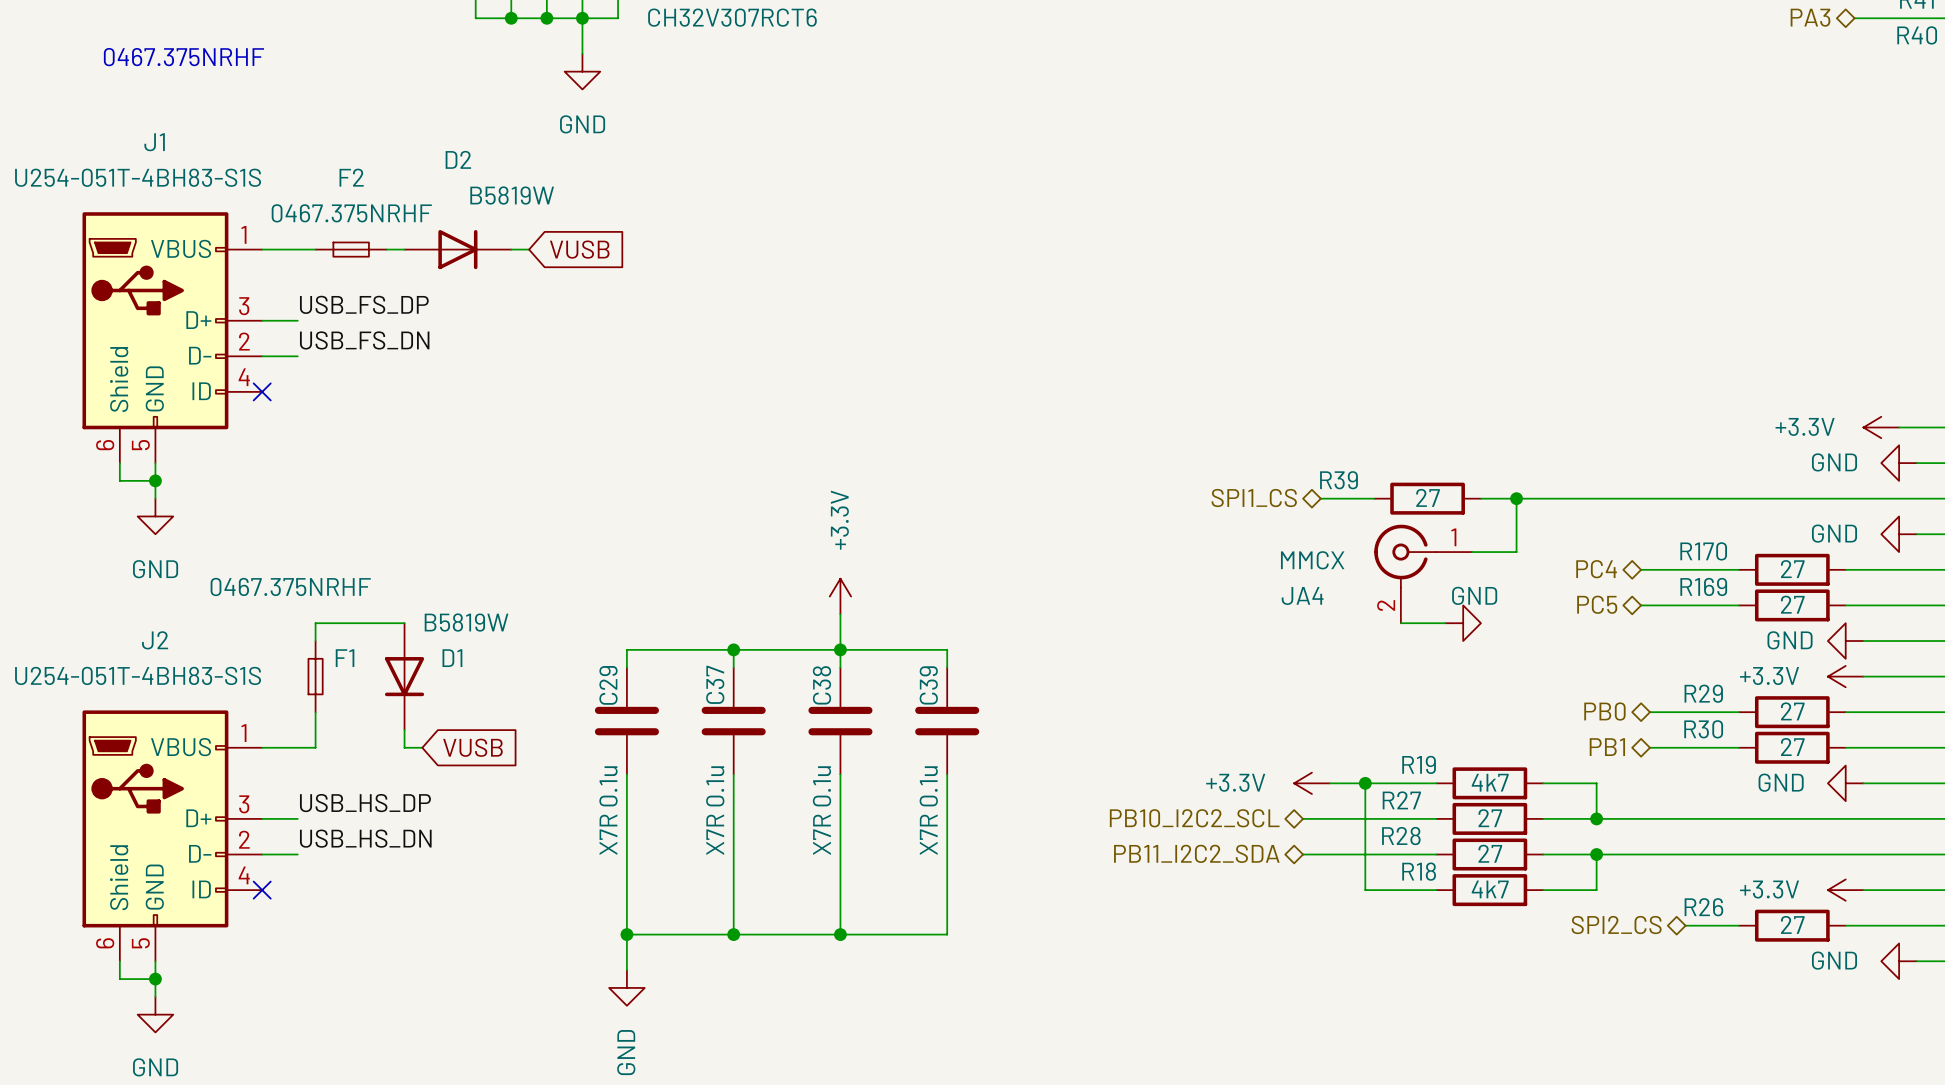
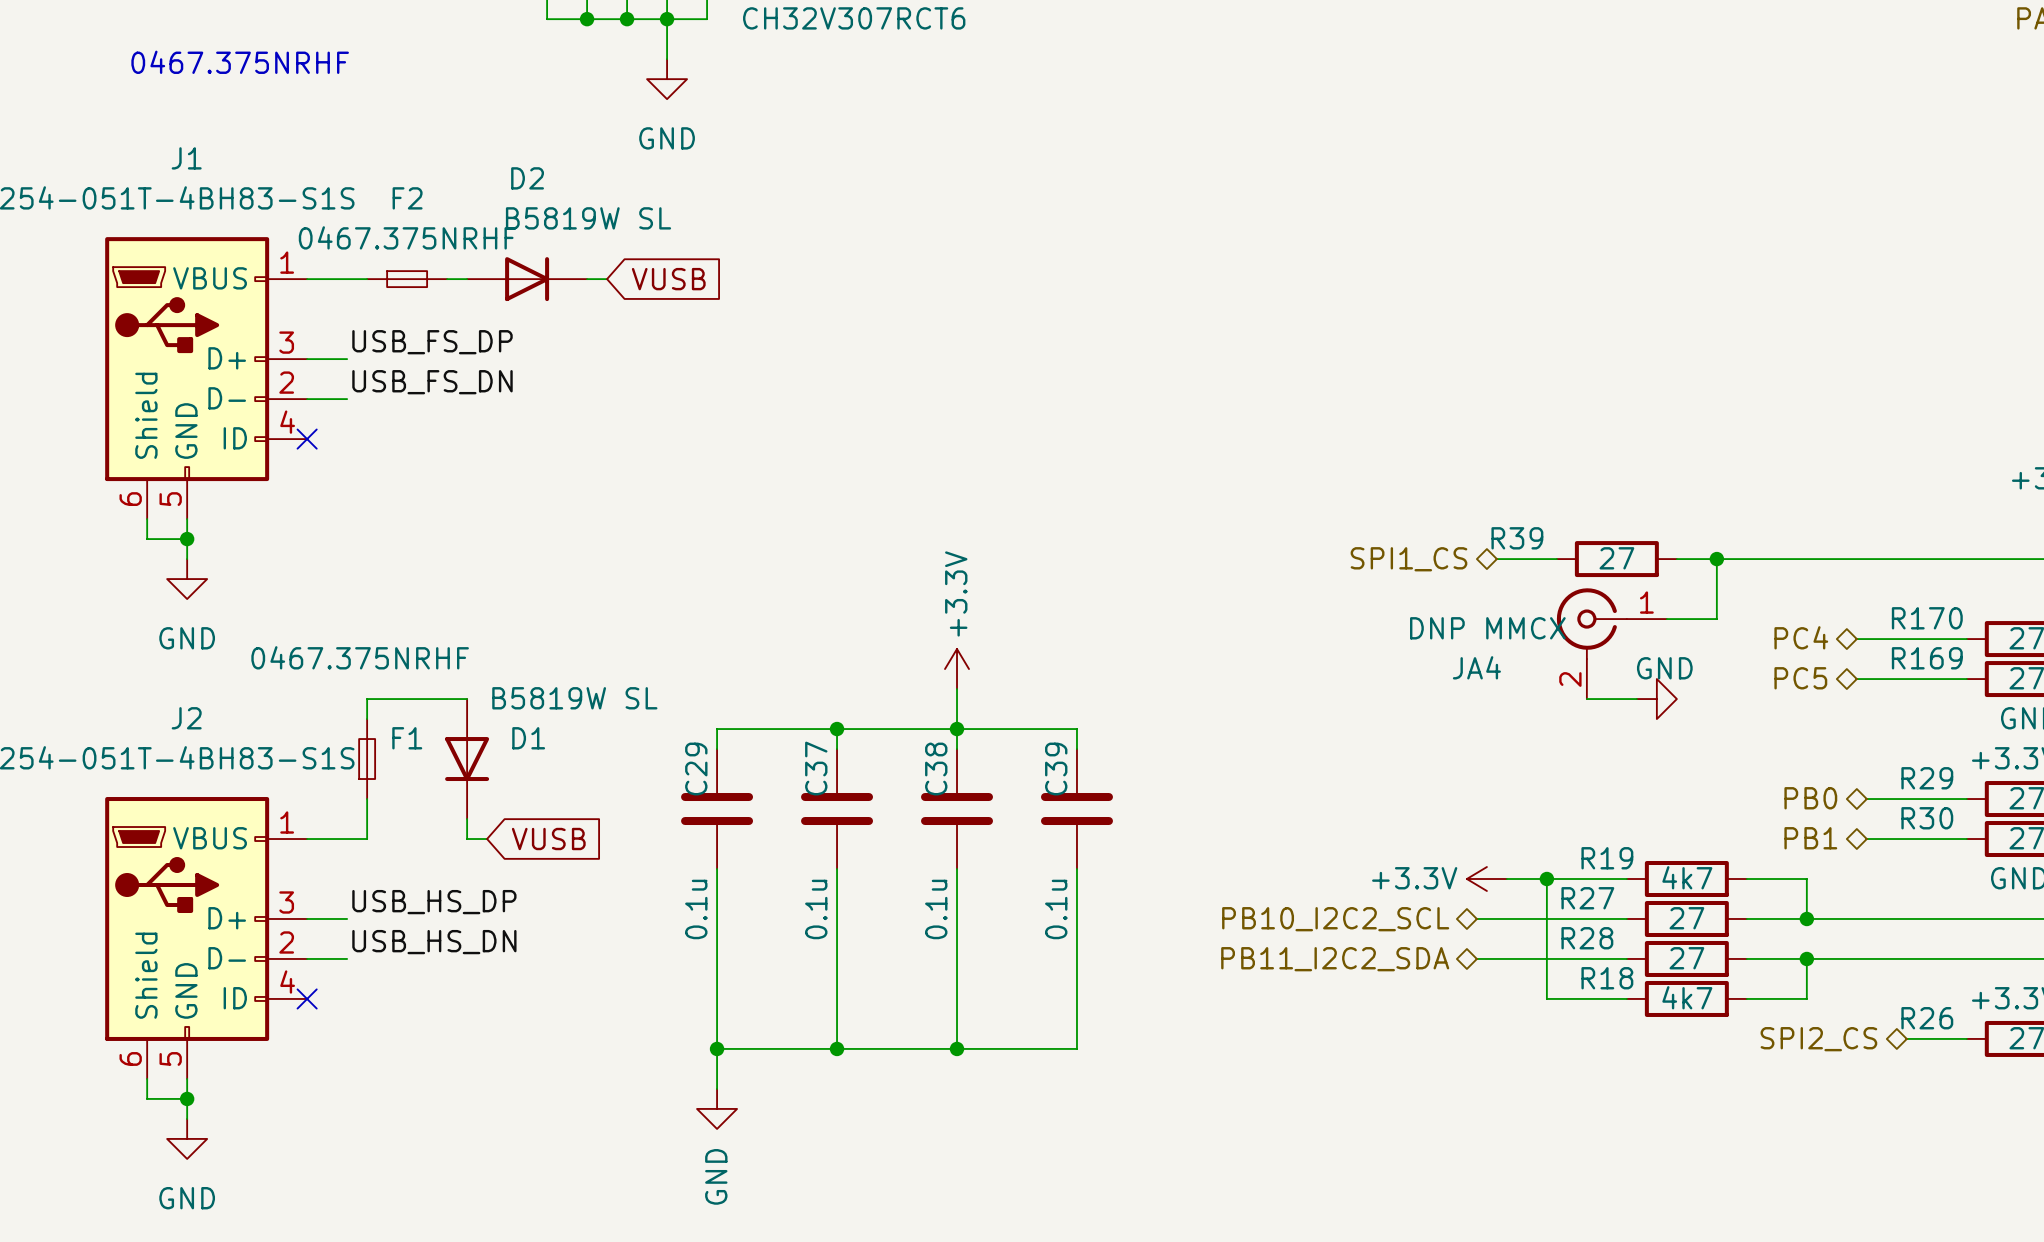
D2 value: B5819W (512, 195) -> B5819W SL (588, 218)
JA4 value: MMCX (1312, 560) -> DNP MMCX (1487, 628)
D1 value: B5819W (466, 622) -> B5819W SL (574, 698)
C29 value: X7R 0.1u (608, 810) -> 0.1u (696, 909)
C37 value: X7R 0.1u (715, 810) -> 0.1u (816, 909)
C38 value: X7R 0.1u (822, 810) -> 0.1u (936, 909)
C39 value: X7R 0.1u (928, 810) -> 0.1u (1056, 909)

